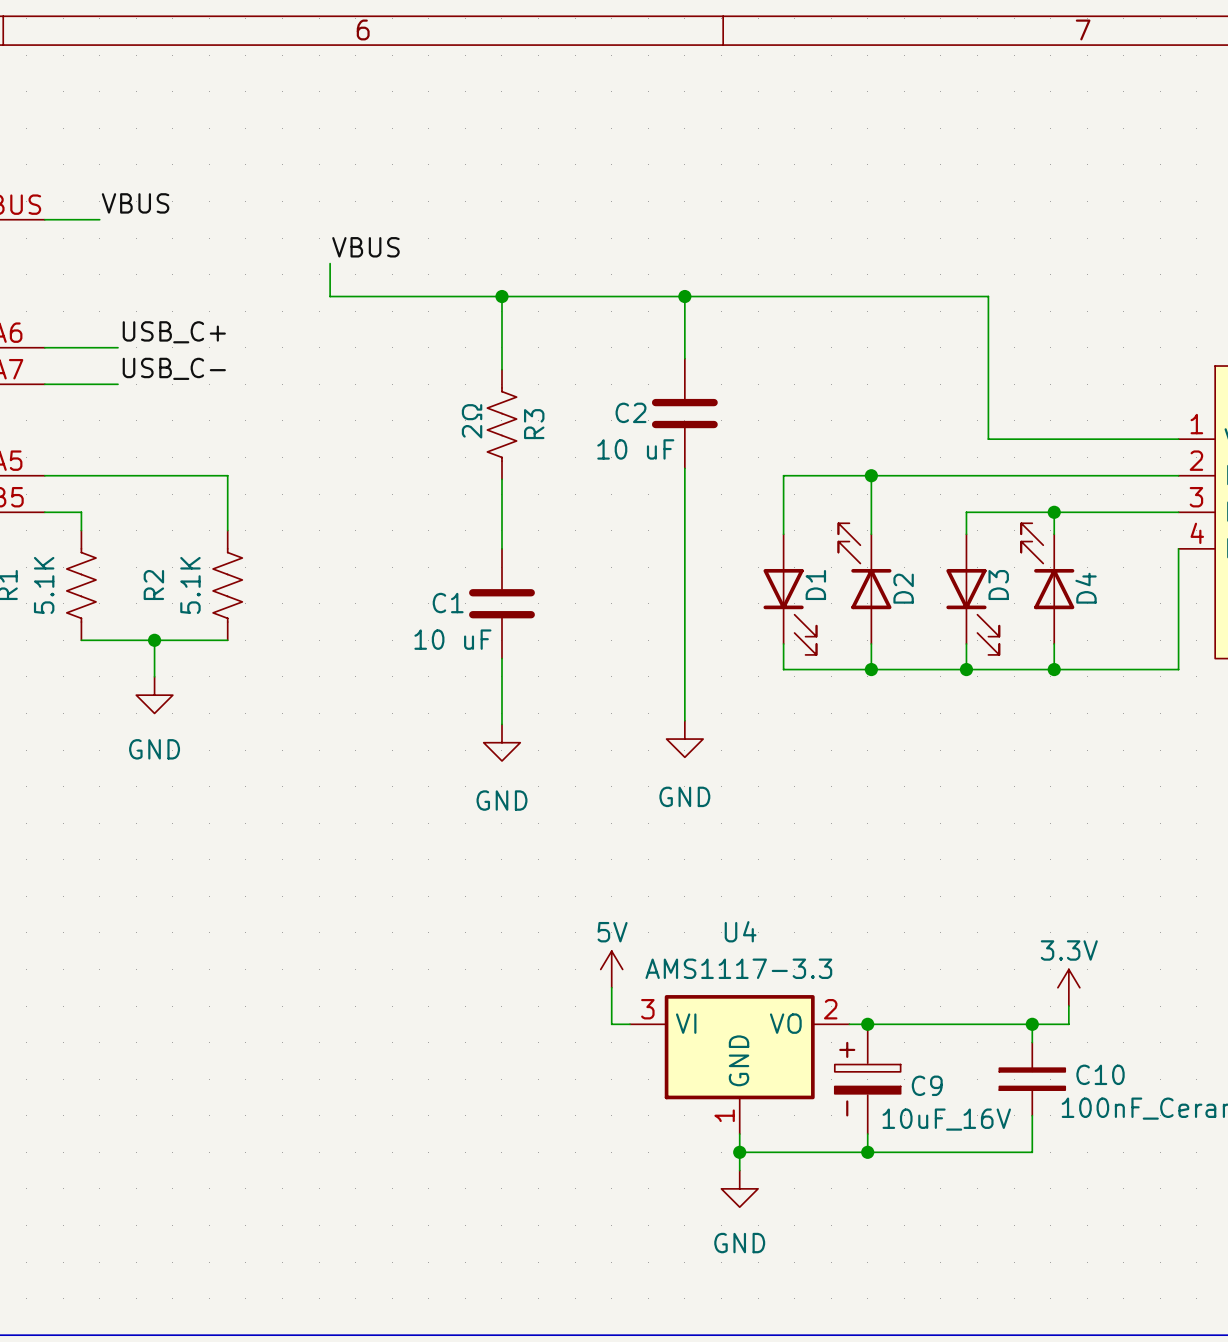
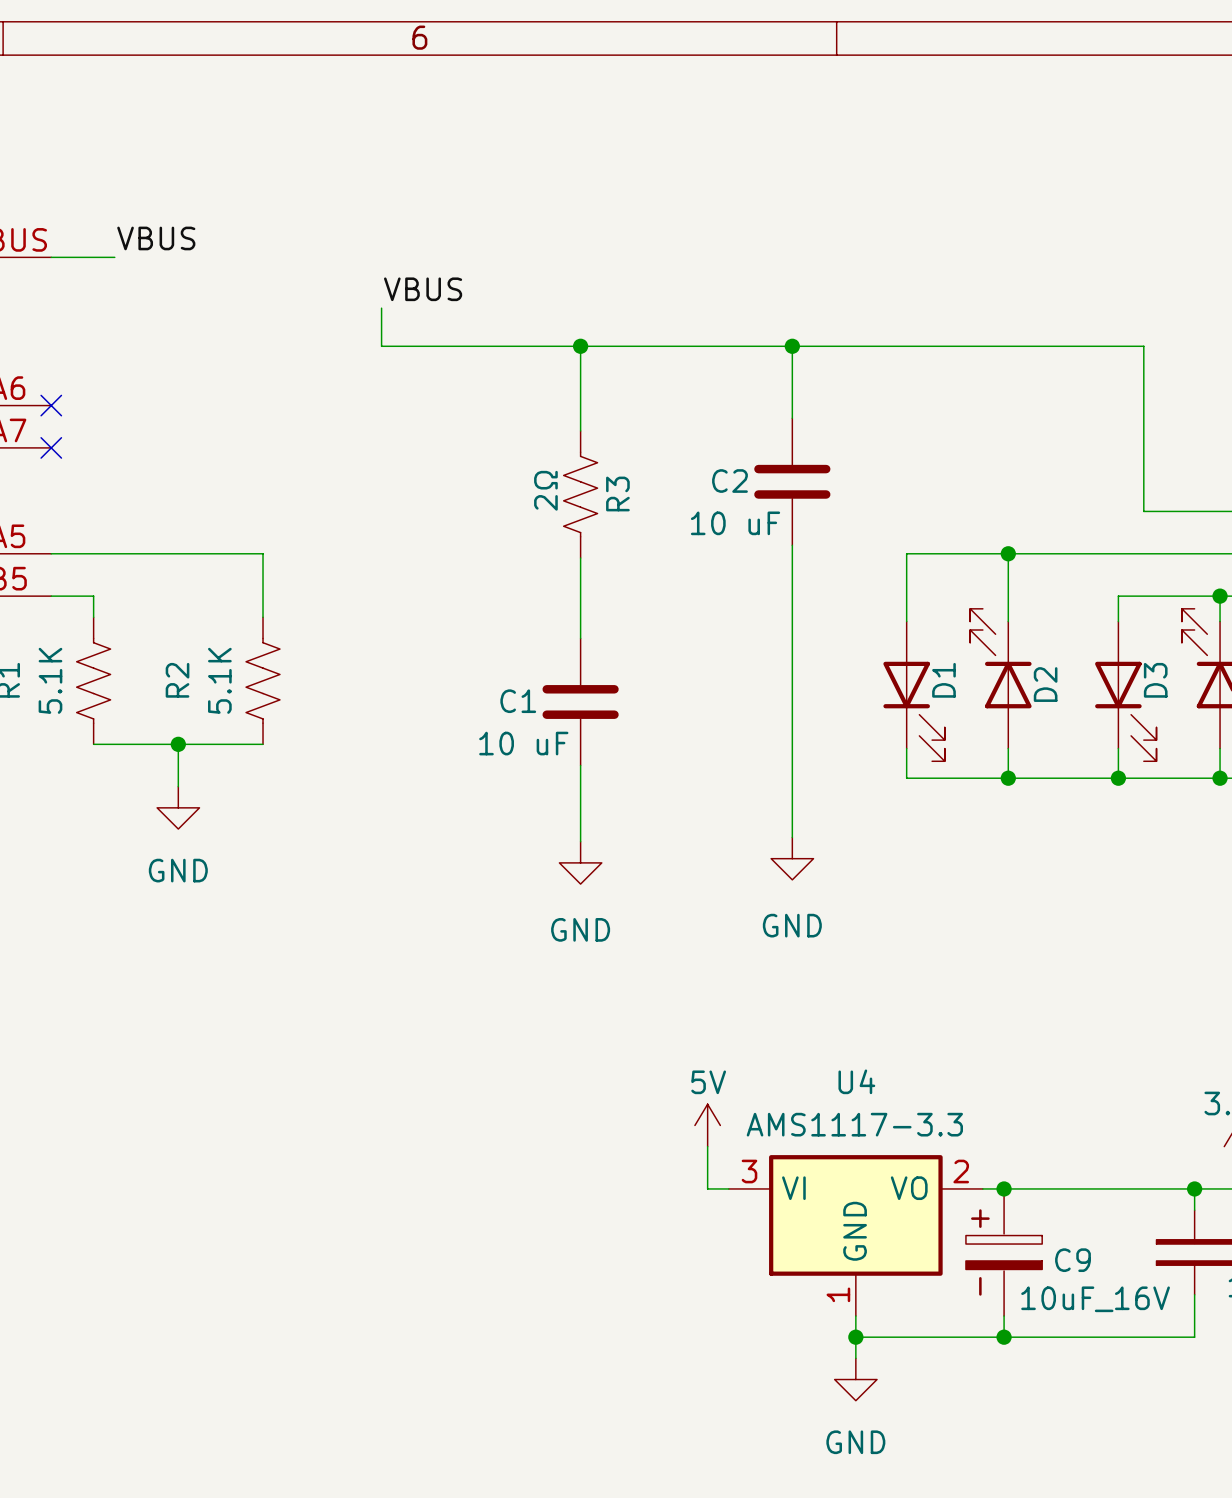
label: USB_C+ (174, 332) -> none
wire: (44, 347) (117, 347) -> none
no-connect mark: none -> (51, 405)
label: USB_C- (174, 368) -> none
wire: (44, 384) (117, 384) -> none
no-connect mark: none -> (51, 447)

